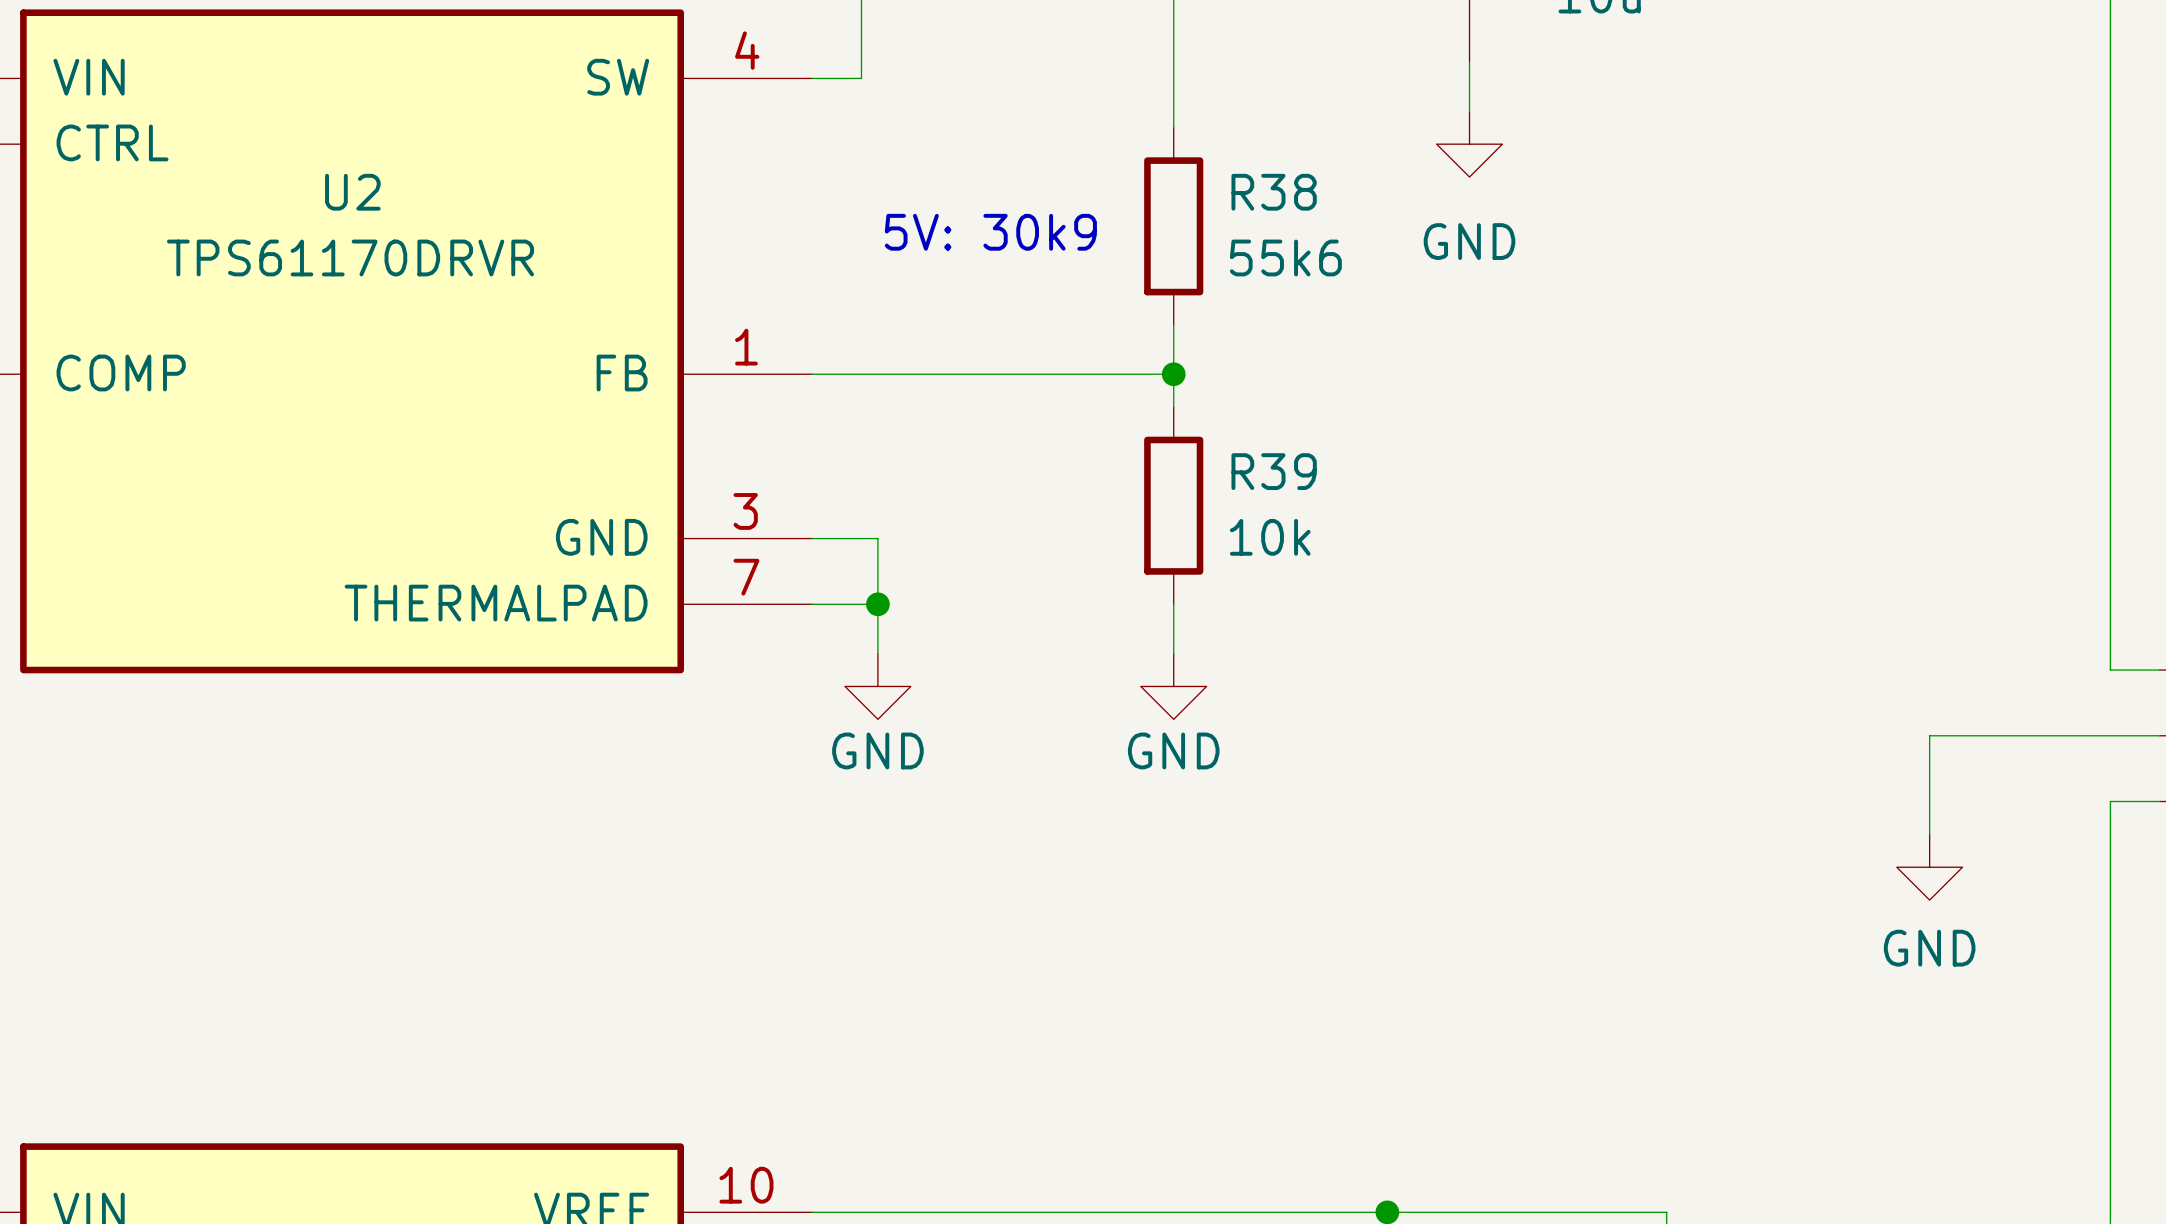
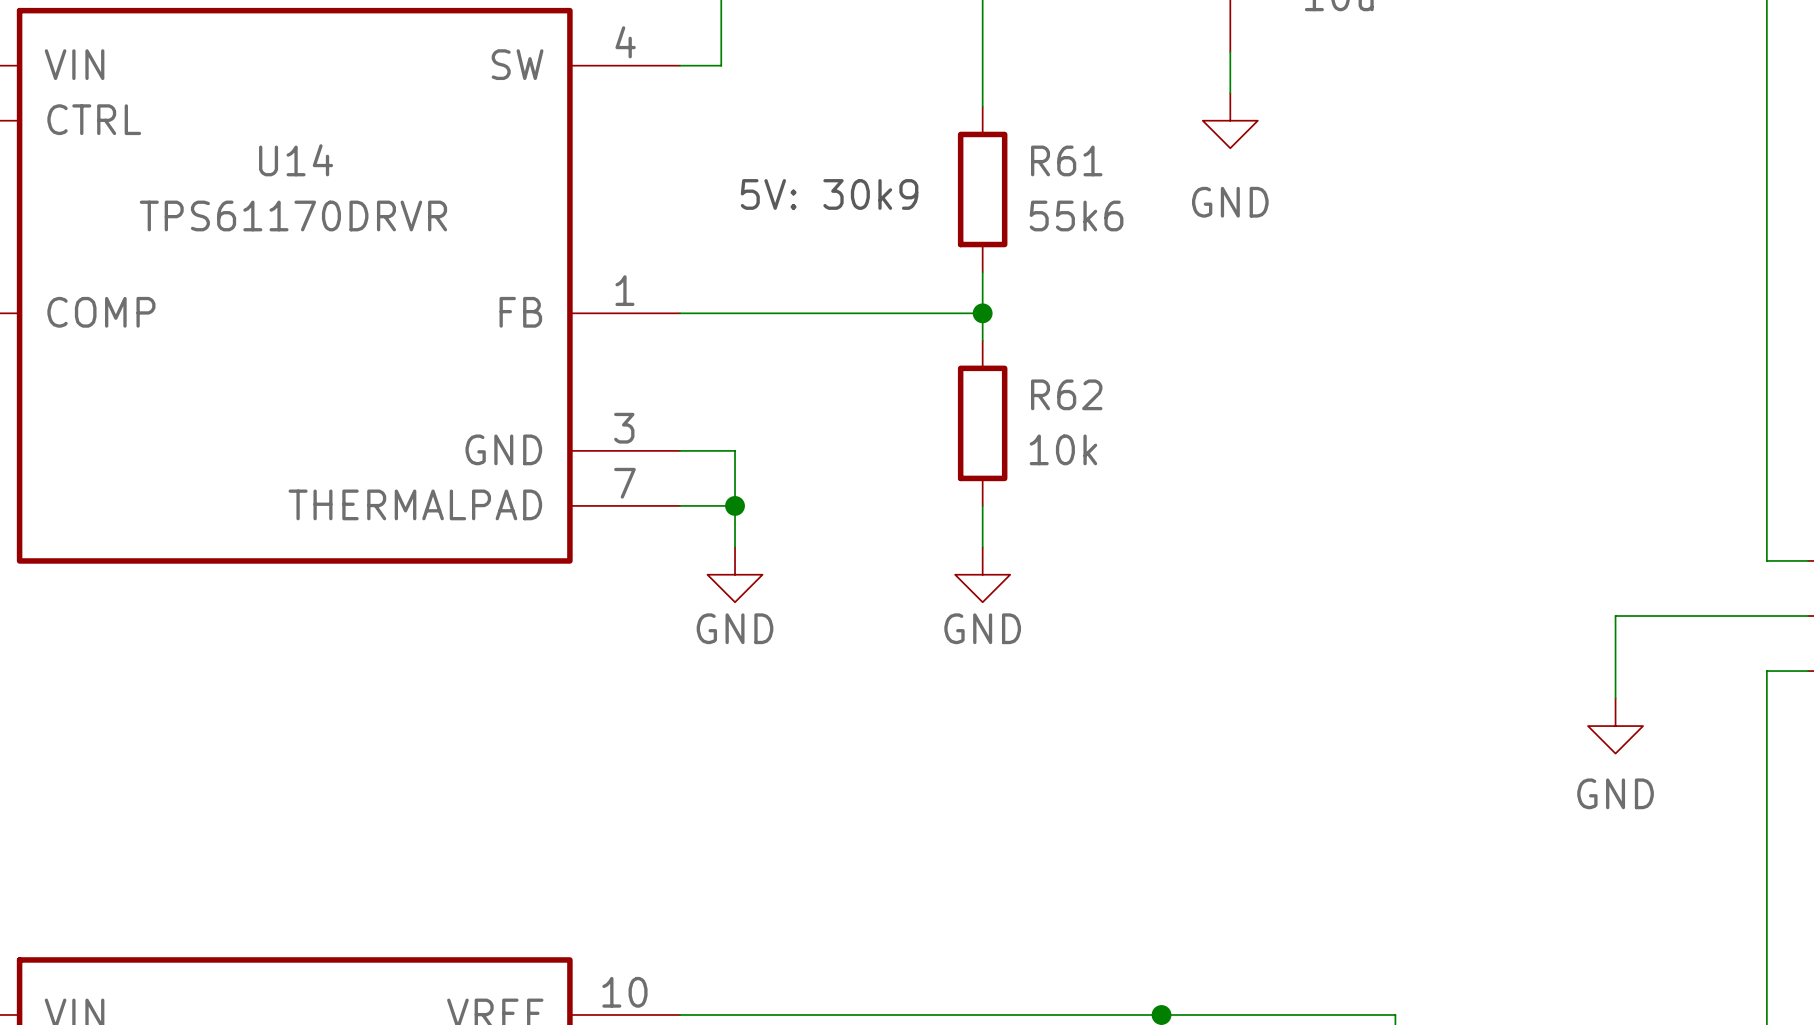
U2 name: U2 (352, 192) -> U14 (296, 160)
R38 name: R38 (1274, 192) -> R61 (1066, 160)
R39 name: R39 (1274, 471) -> R62 (1066, 394)

